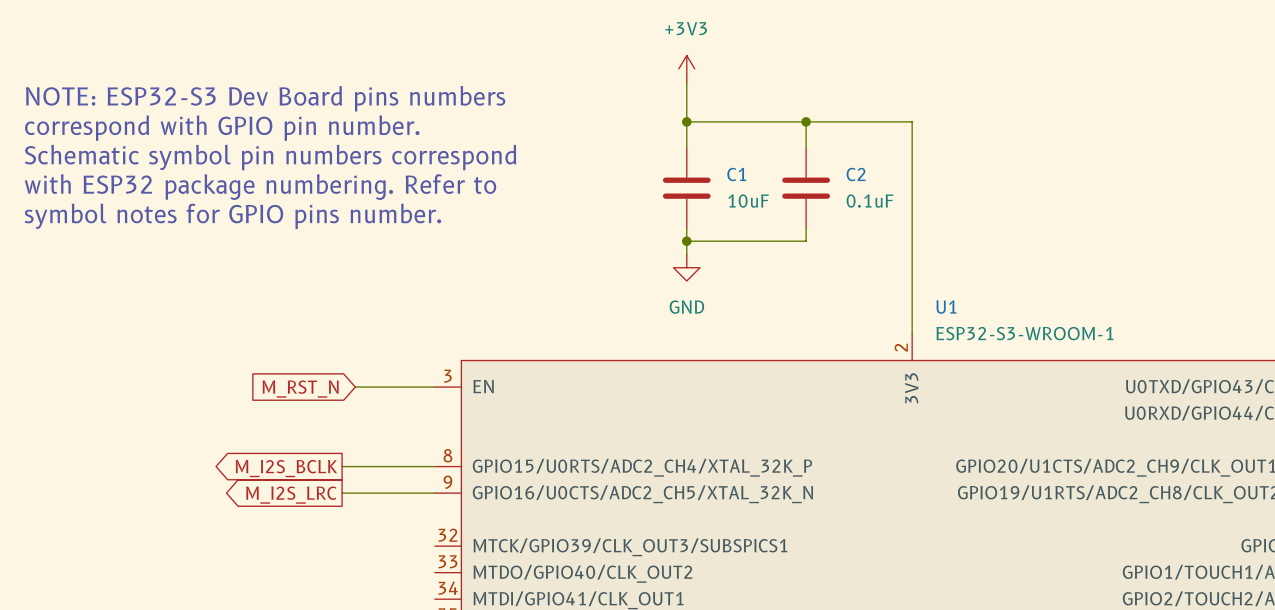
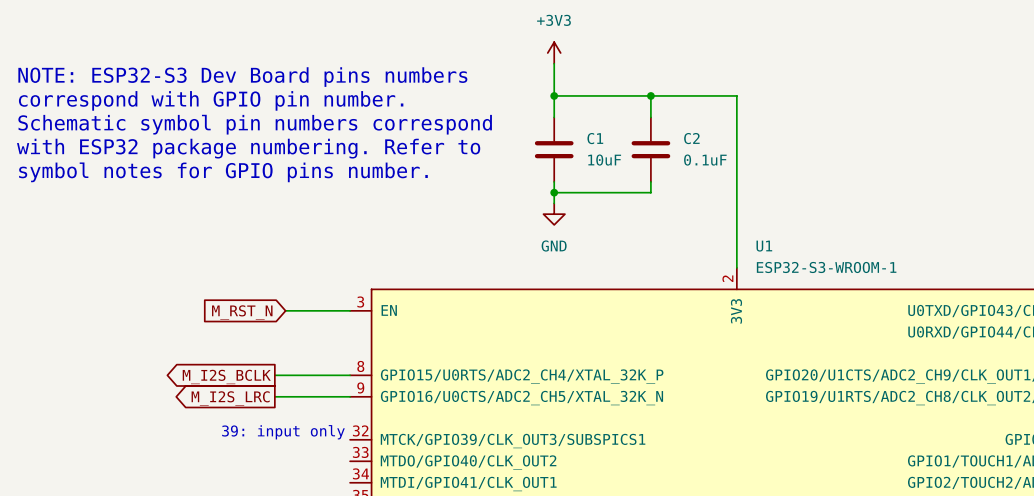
text: none -> 39: input only (283, 432)

